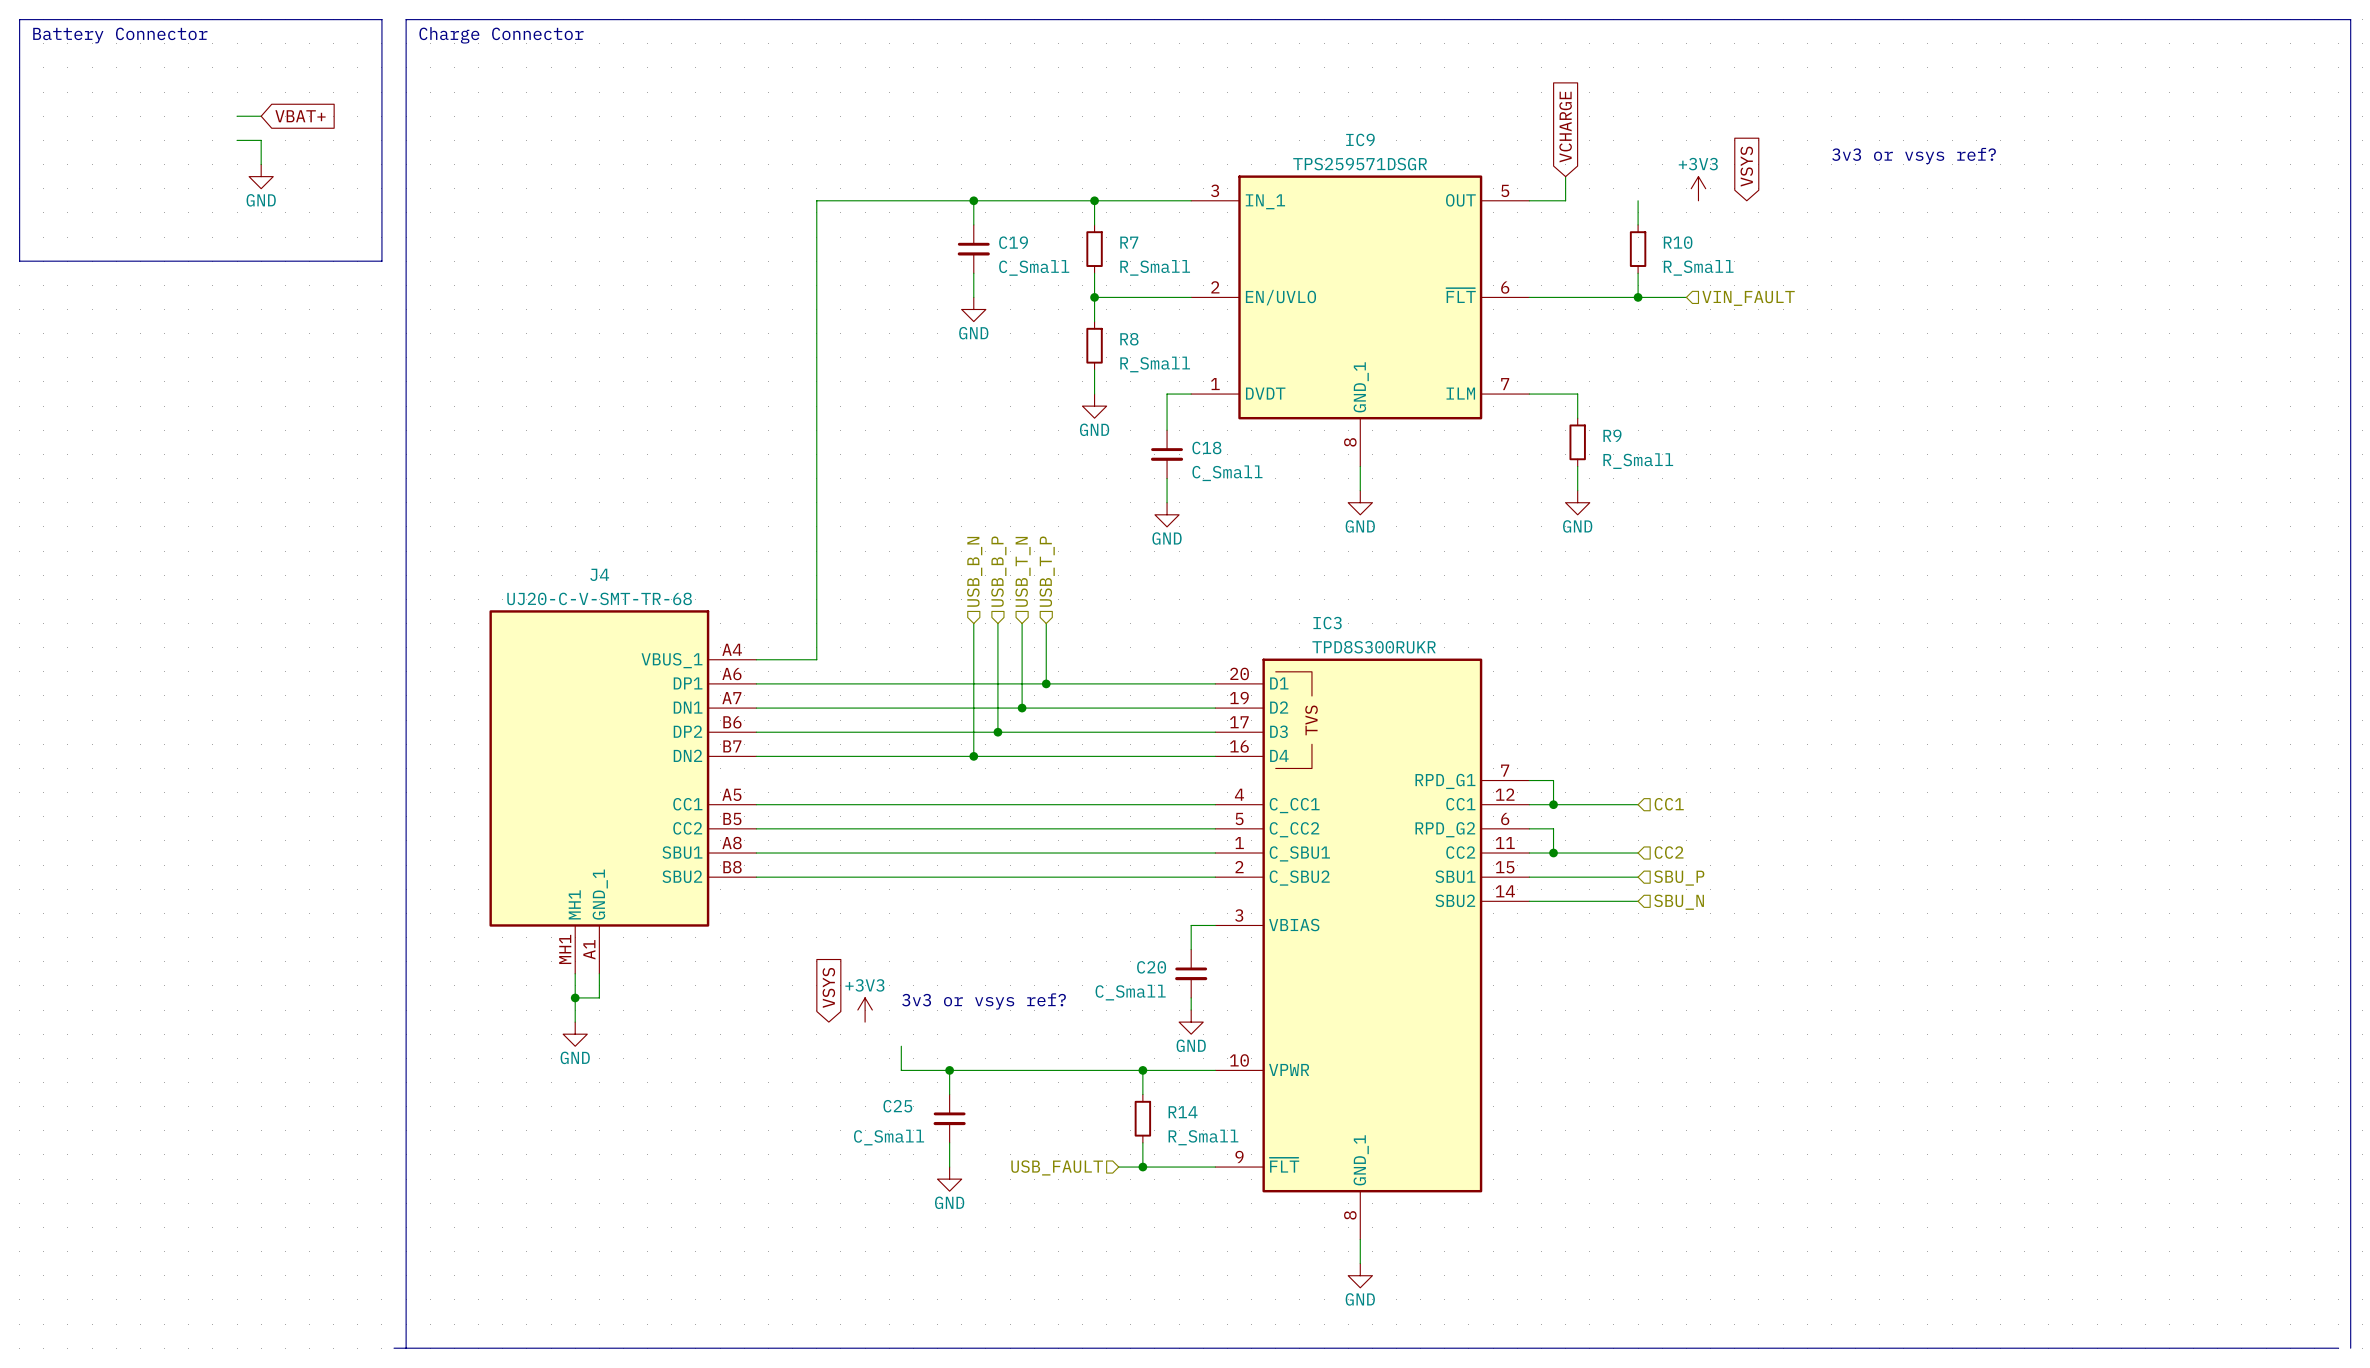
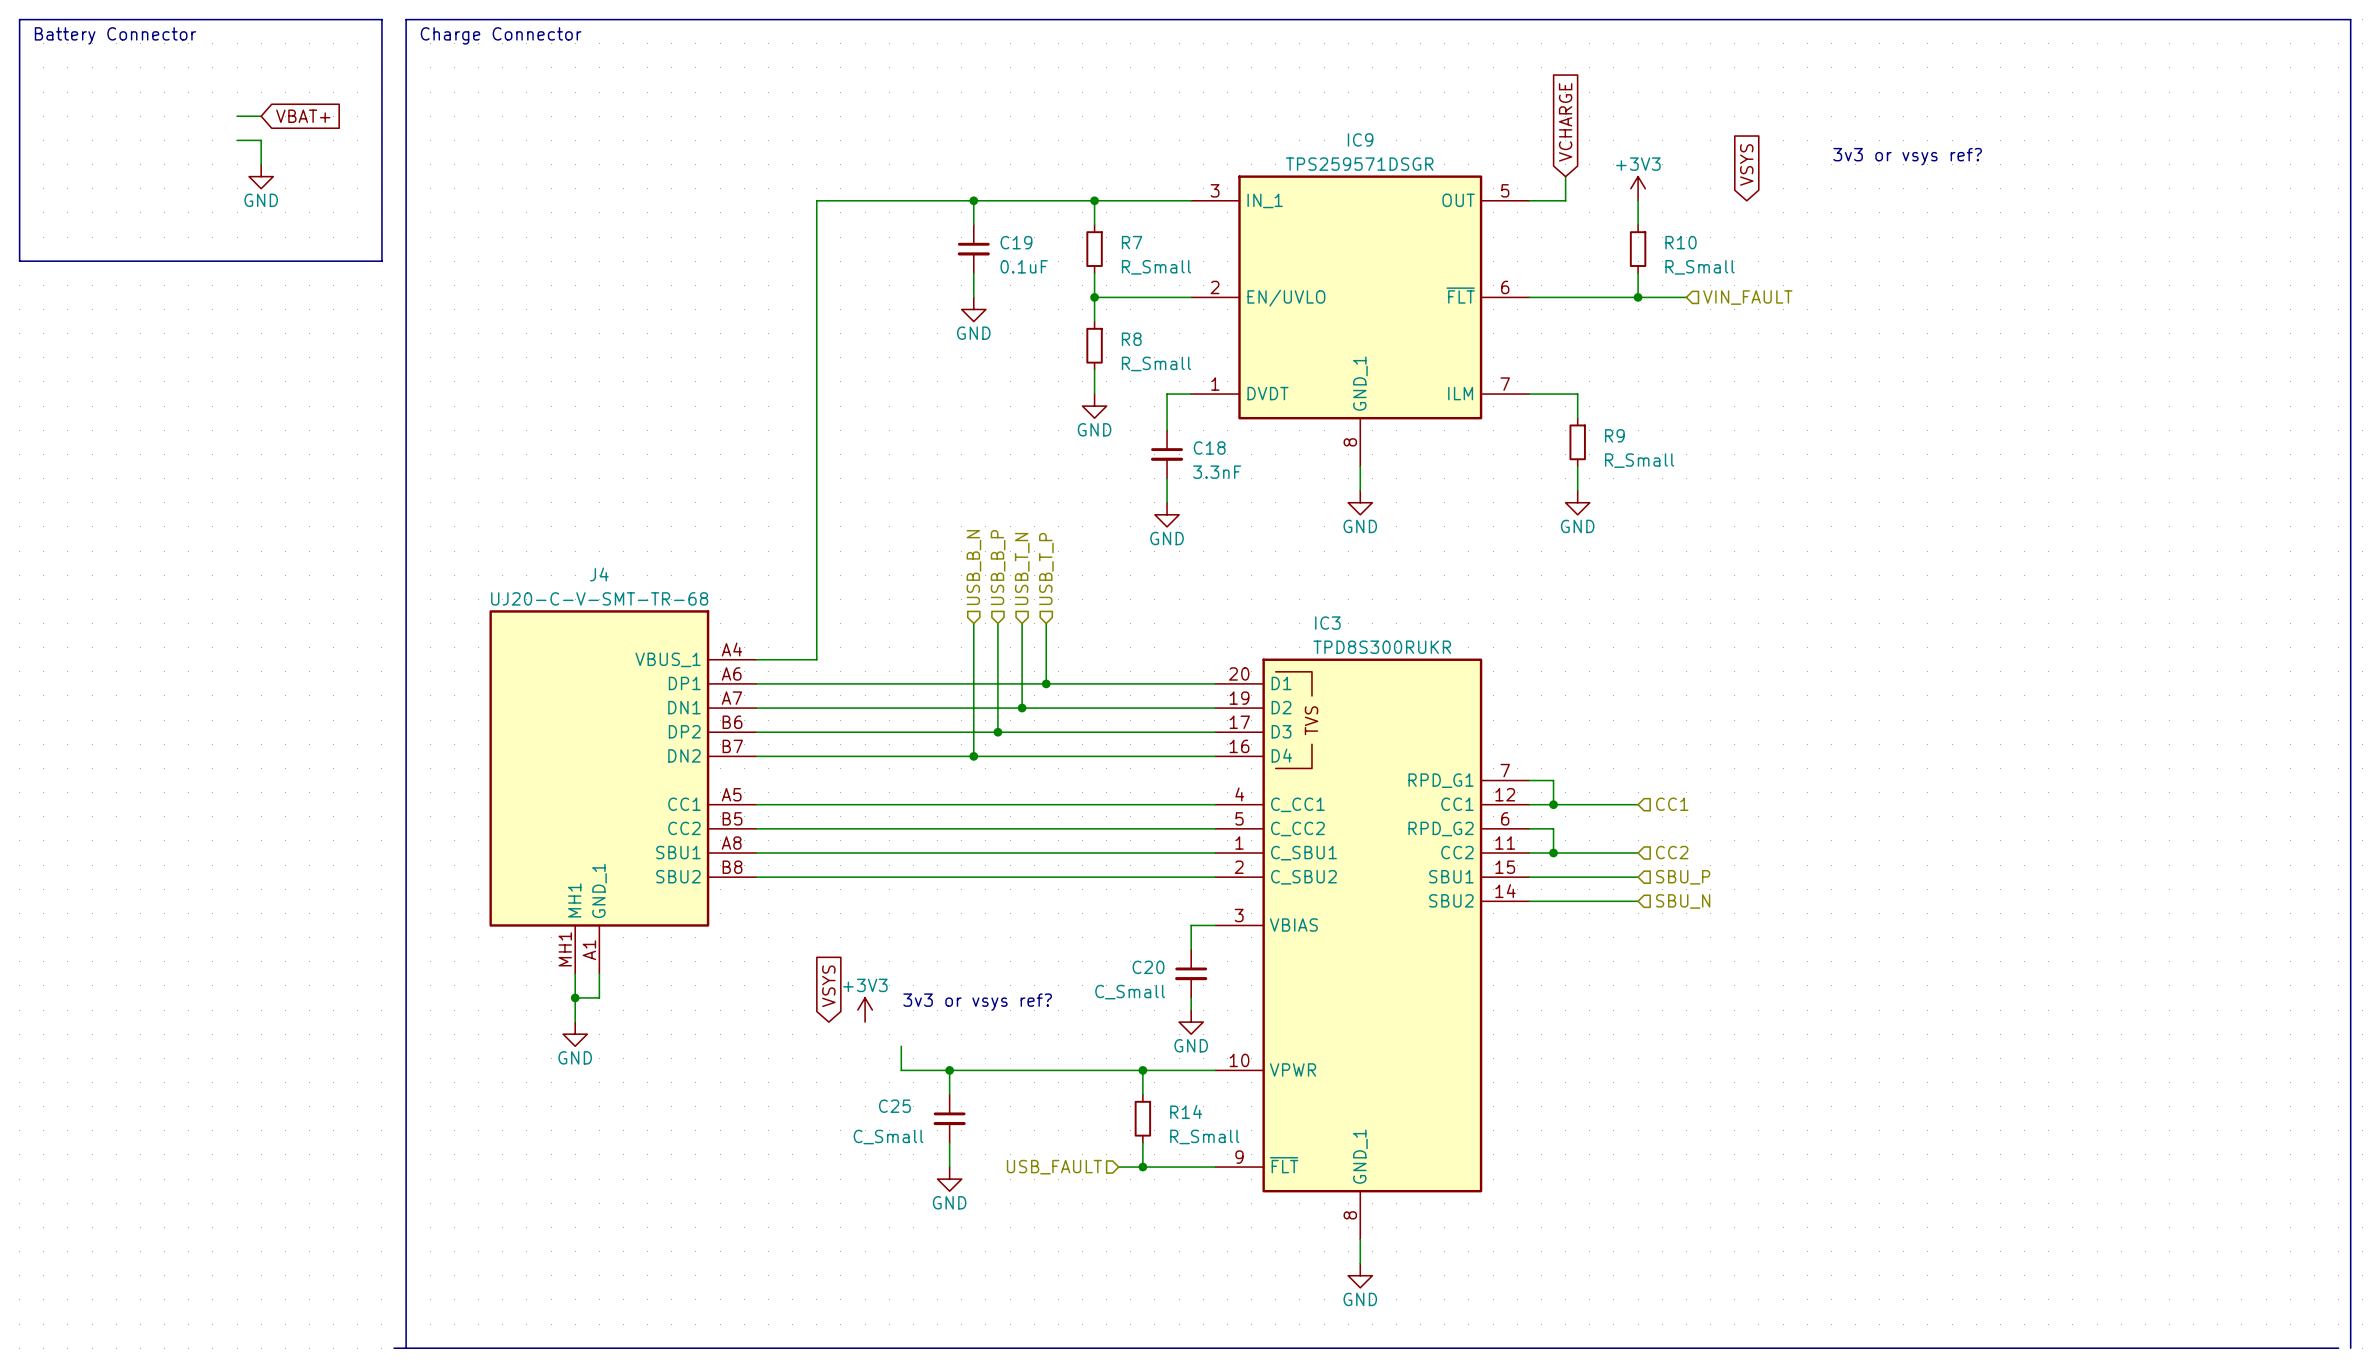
power symbol position: +3V3 (1698, 188) -> +3V3 (1638, 188)
C19 value: C_Small (1034, 267) -> 0.1uF (1024, 266)
C18 value: C_Small (1227, 473) -> 3.3nF (1217, 472)

